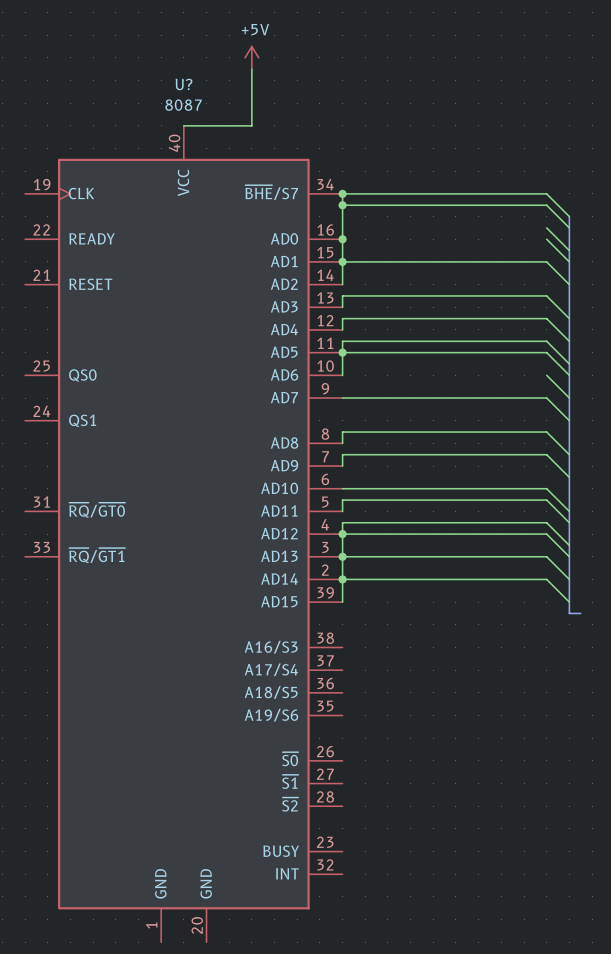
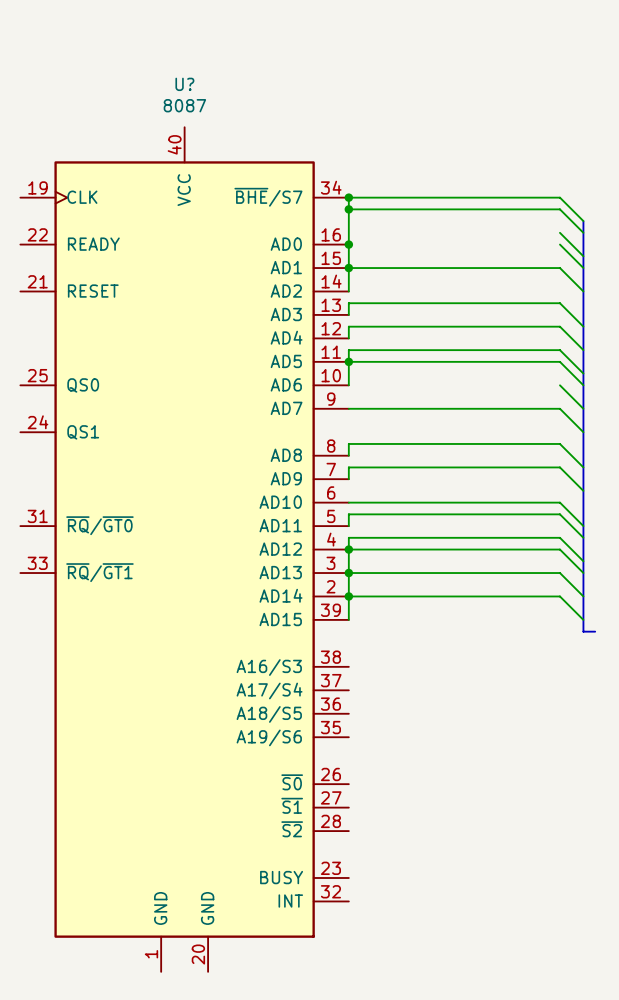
power symbol: +5V (251, 57) -> none
wire: (251, 69) (251, 125) (183, 125) -> none

